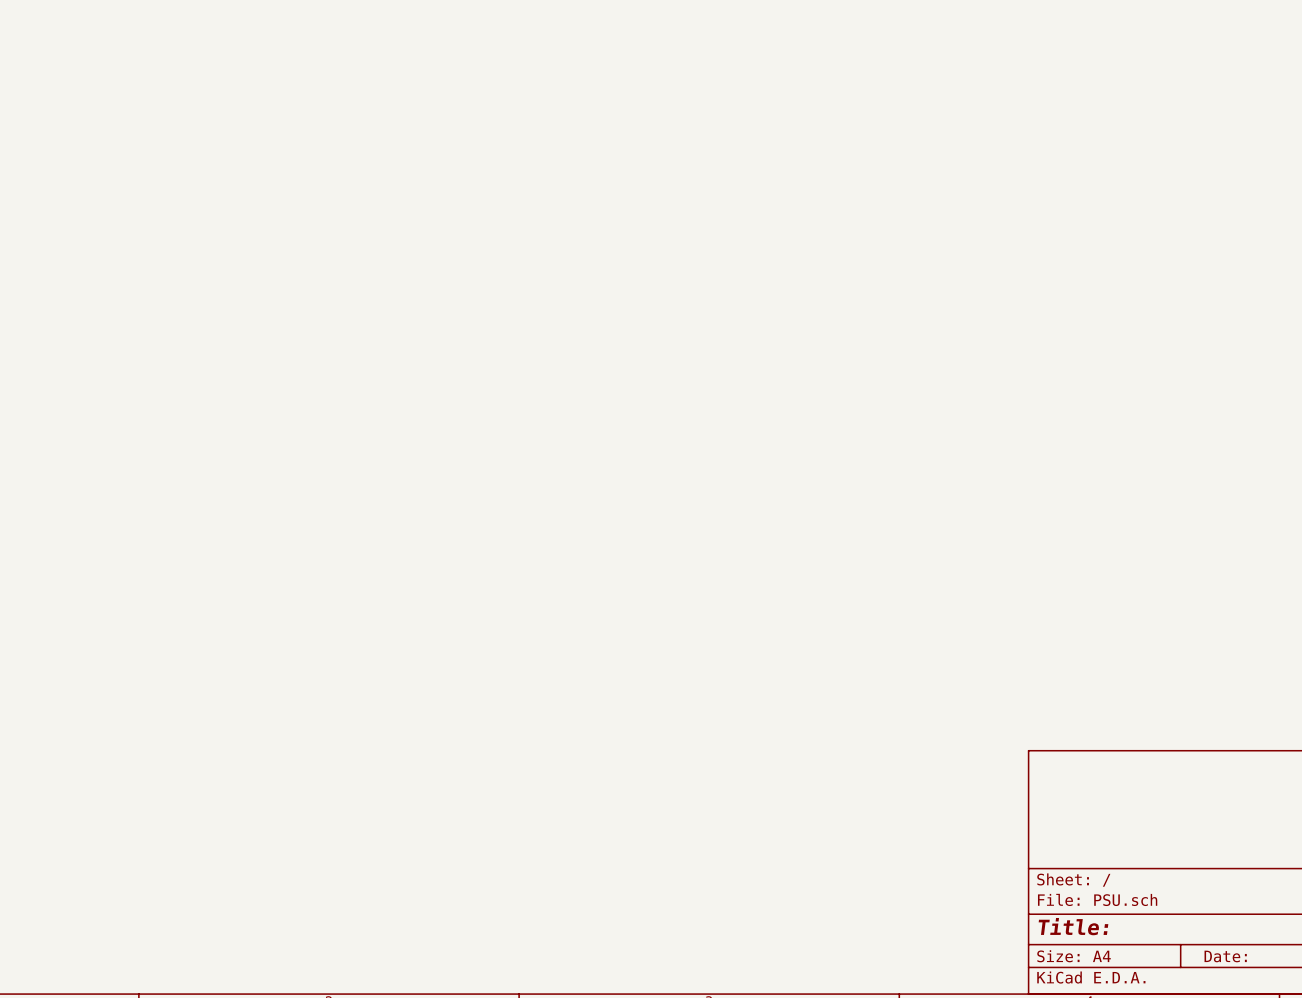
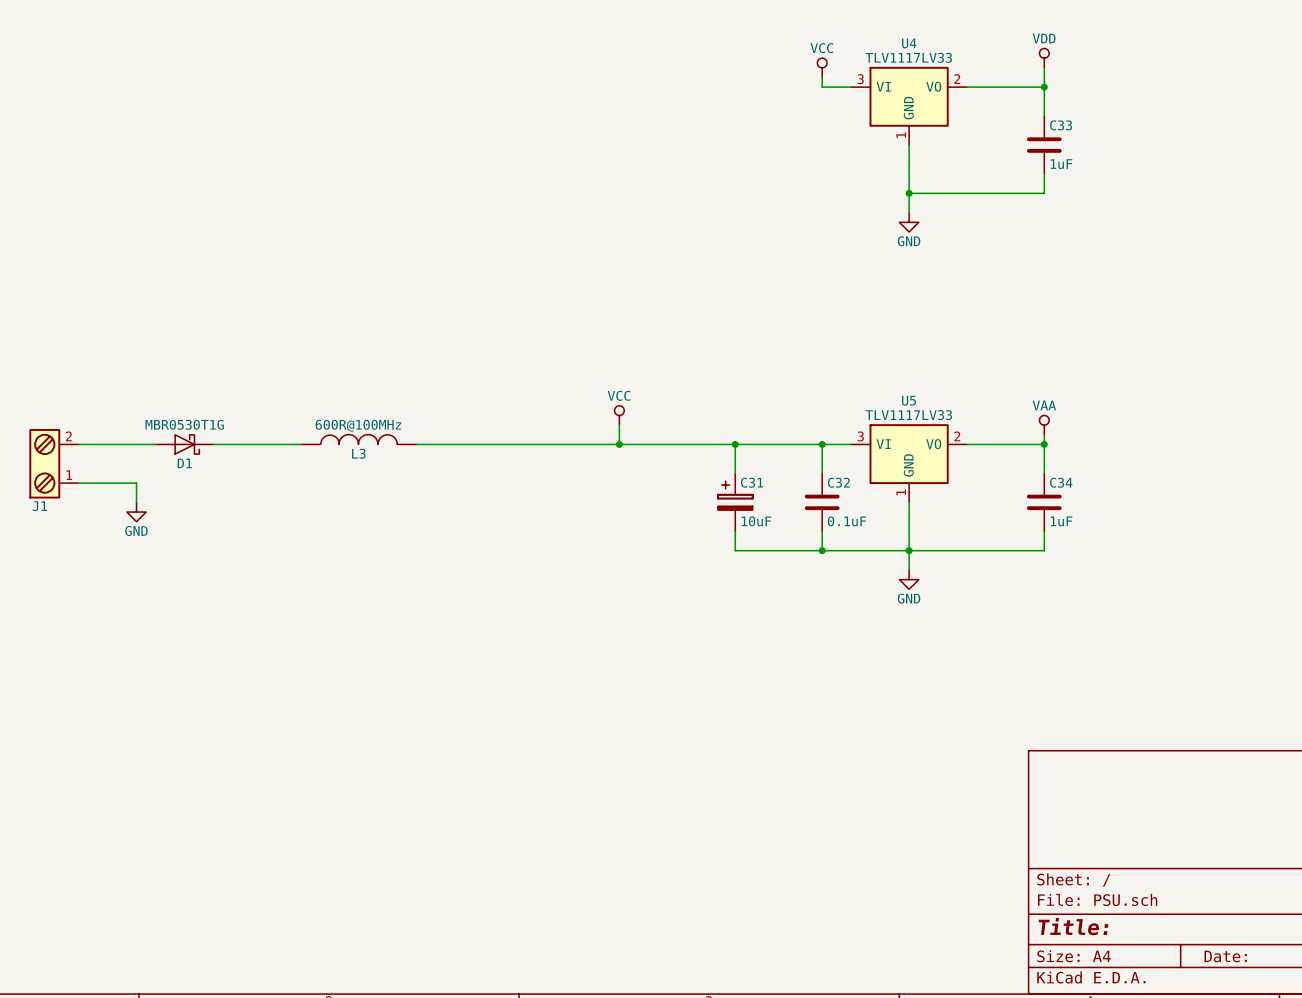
power symbol: none -> VDD (1044, 58)
power symbol: none -> VCC (822, 67)
wire: none -> (1044, 67) (1044, 116)
wire: none -> (822, 77) (822, 87) (851, 87)
wire: none -> (967, 87) (1044, 87)
junction: none -> (1044, 87)
U4: none -> TLV1117LV33 (909, 105)
wire: none -> (909, 145) (909, 212)
C33: none -> 1uF (1044, 145)
wire: none -> (1044, 174) (1044, 193) (909, 193)
junction: none -> (909, 193)
power symbol: none -> GND (909, 222)
power symbol: none -> VCC (619, 415)
wire: none -> (619, 425) (619, 444)
power symbol: none -> VAA (1044, 425)
wire: none -> (1044, 434) (1044, 473)
L3: none -> 600R@100MHz (358, 439)
wire: none -> (78, 444) (155, 444)
D1: none -> MBR0530T1G (184, 444)
wire: none -> (213, 444) (300, 444)
wire: none -> (416, 444) (851, 444)
junction: none -> (619, 444)
wire: none -> (735, 444) (735, 473)
junction: none -> (735, 444)
wire: none -> (822, 444) (822, 473)
junction: none -> (822, 444)
wire: none -> (967, 444) (1044, 444)
junction: none -> (1044, 444)
J1: none -> (53, 463)
U5: none -> TLV1117LV33 (909, 463)
wire: none -> (78, 483) (136, 483) (136, 502)
C31: none -> 10uF (735, 502)
C32: none -> 0.1uF (822, 502)
wire: none -> (909, 502) (909, 570)
C34: none -> 1uF (1044, 502)
power symbol: none -> GND (136, 512)
wire: none -> (735, 531) (735, 550) (1044, 550) (1044, 531)
wire: none -> (822, 531) (822, 550)
junction: none -> (822, 550)
junction: none -> (909, 550)
power symbol: none -> GND (909, 579)

